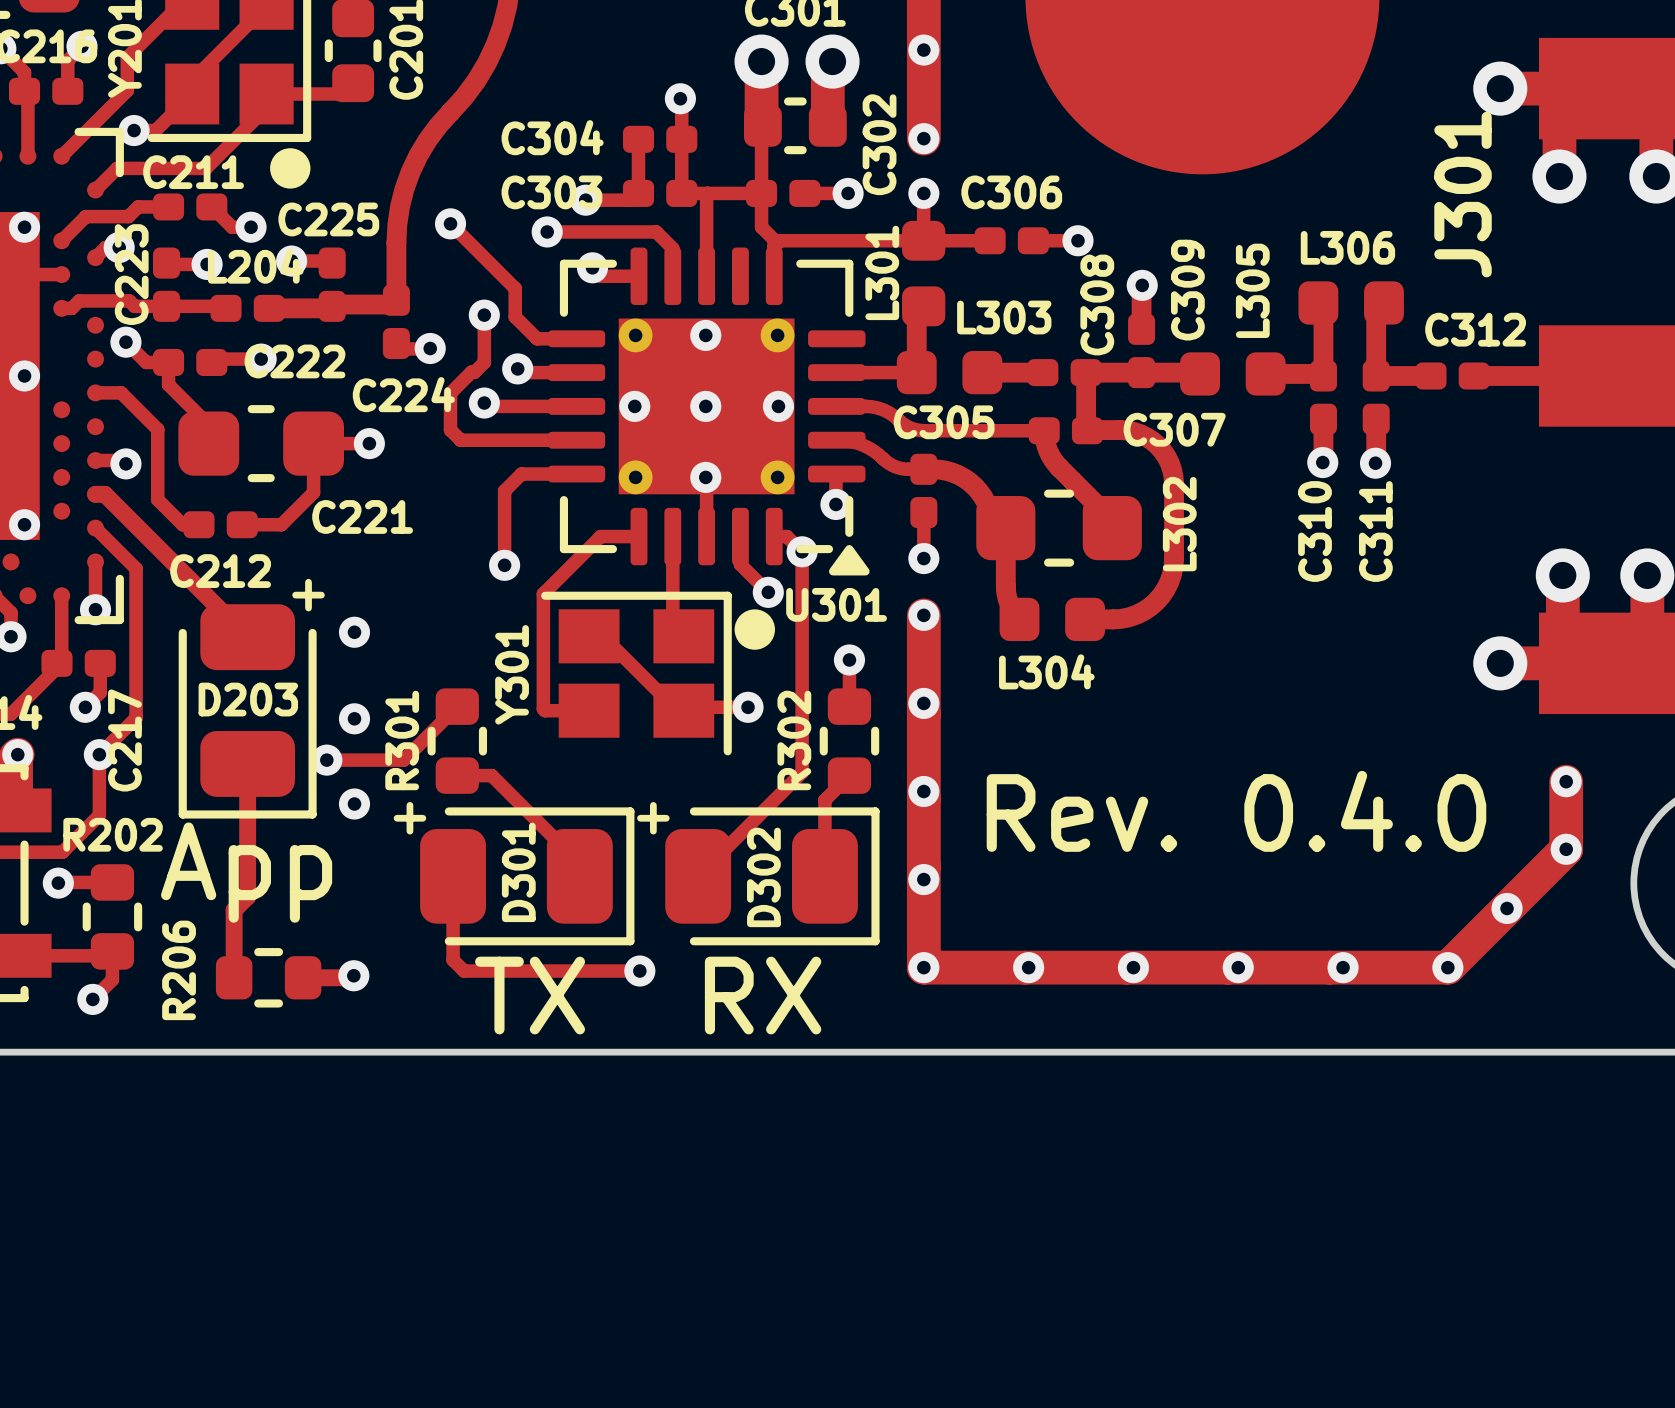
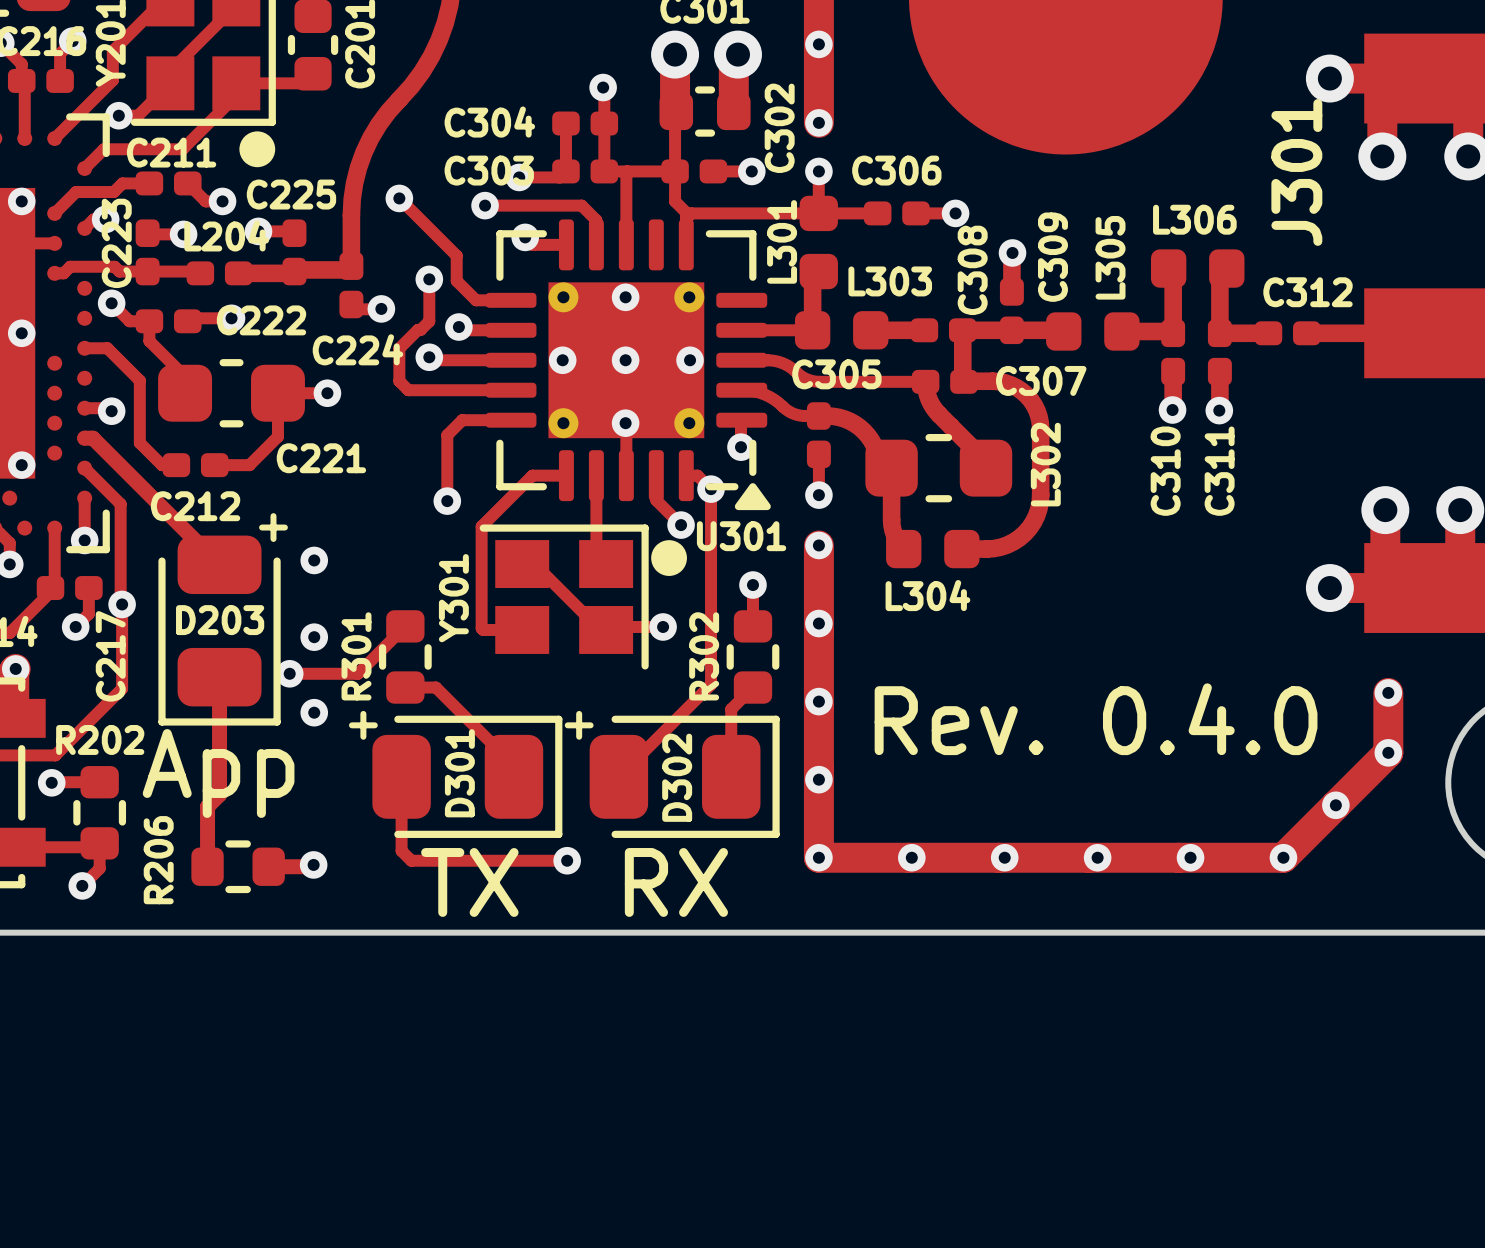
track: (136, 680) (136, 717) (99, 754) (99, 815) -> (120, 602) (122, 688) (88, 722)
via position: (99, 754) -> (122, 604)

